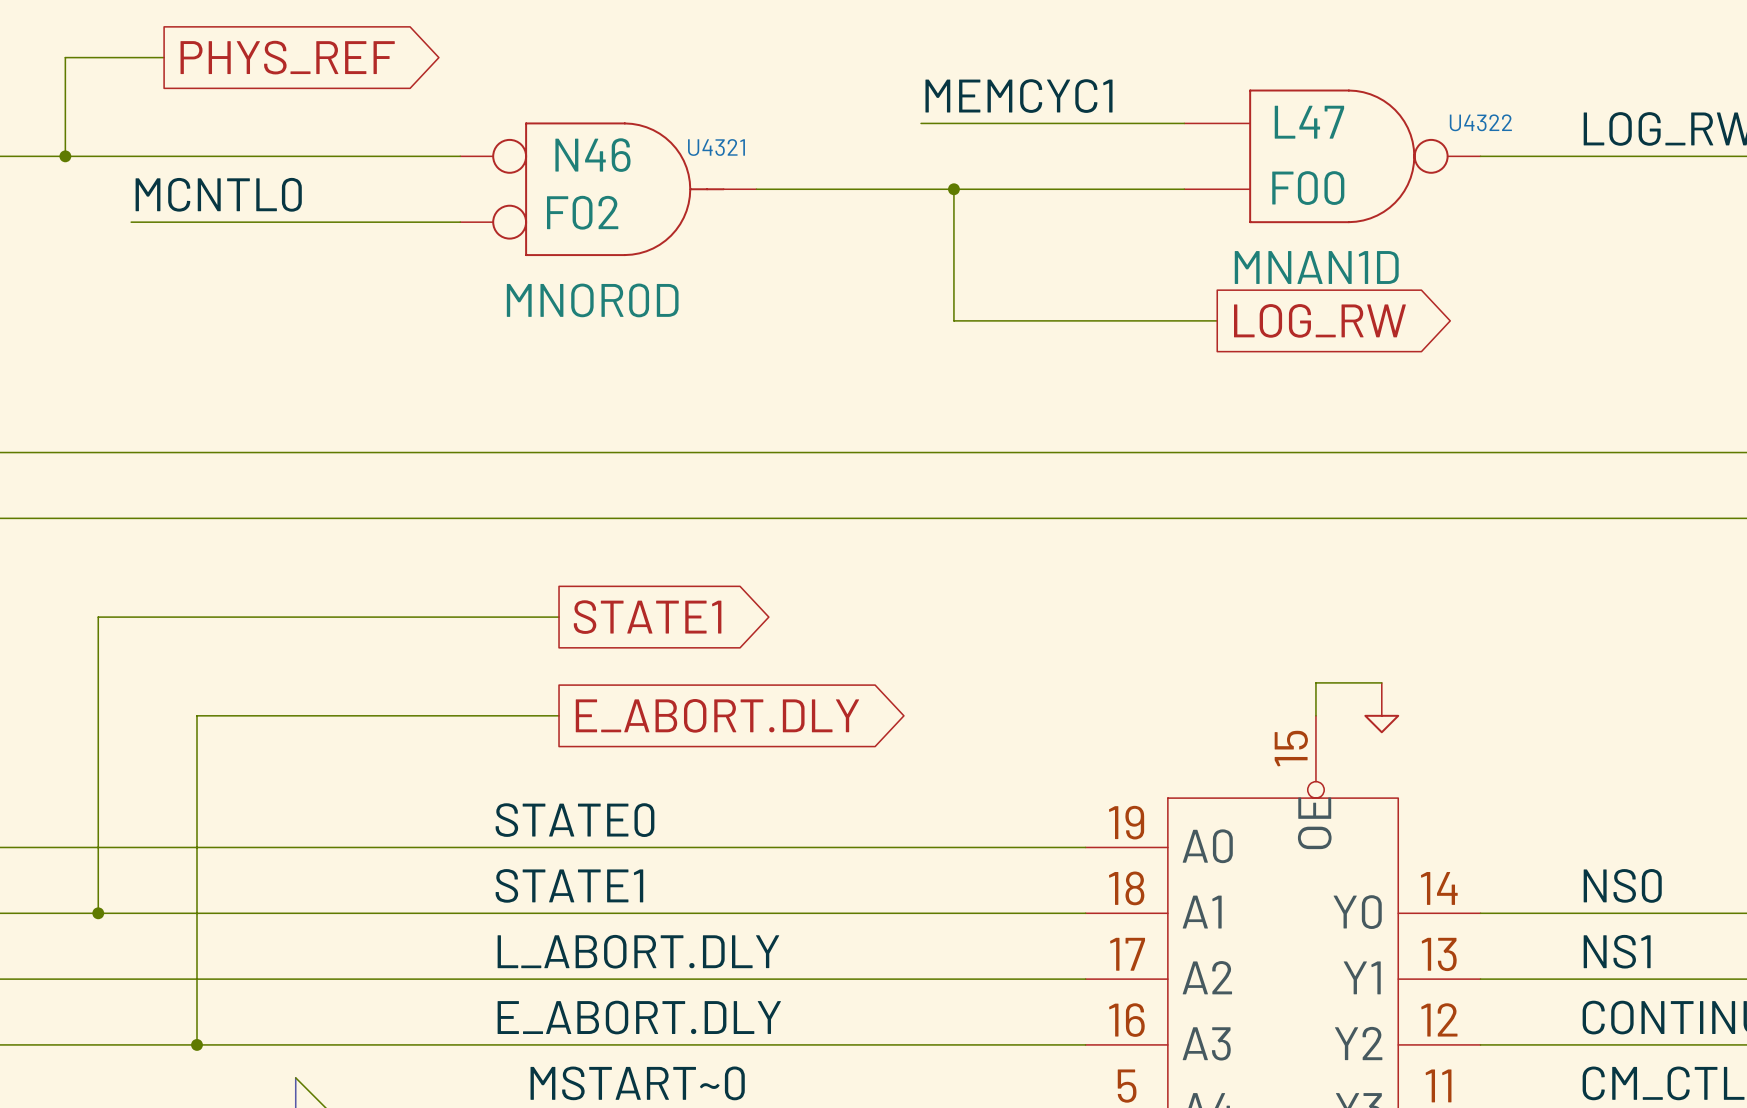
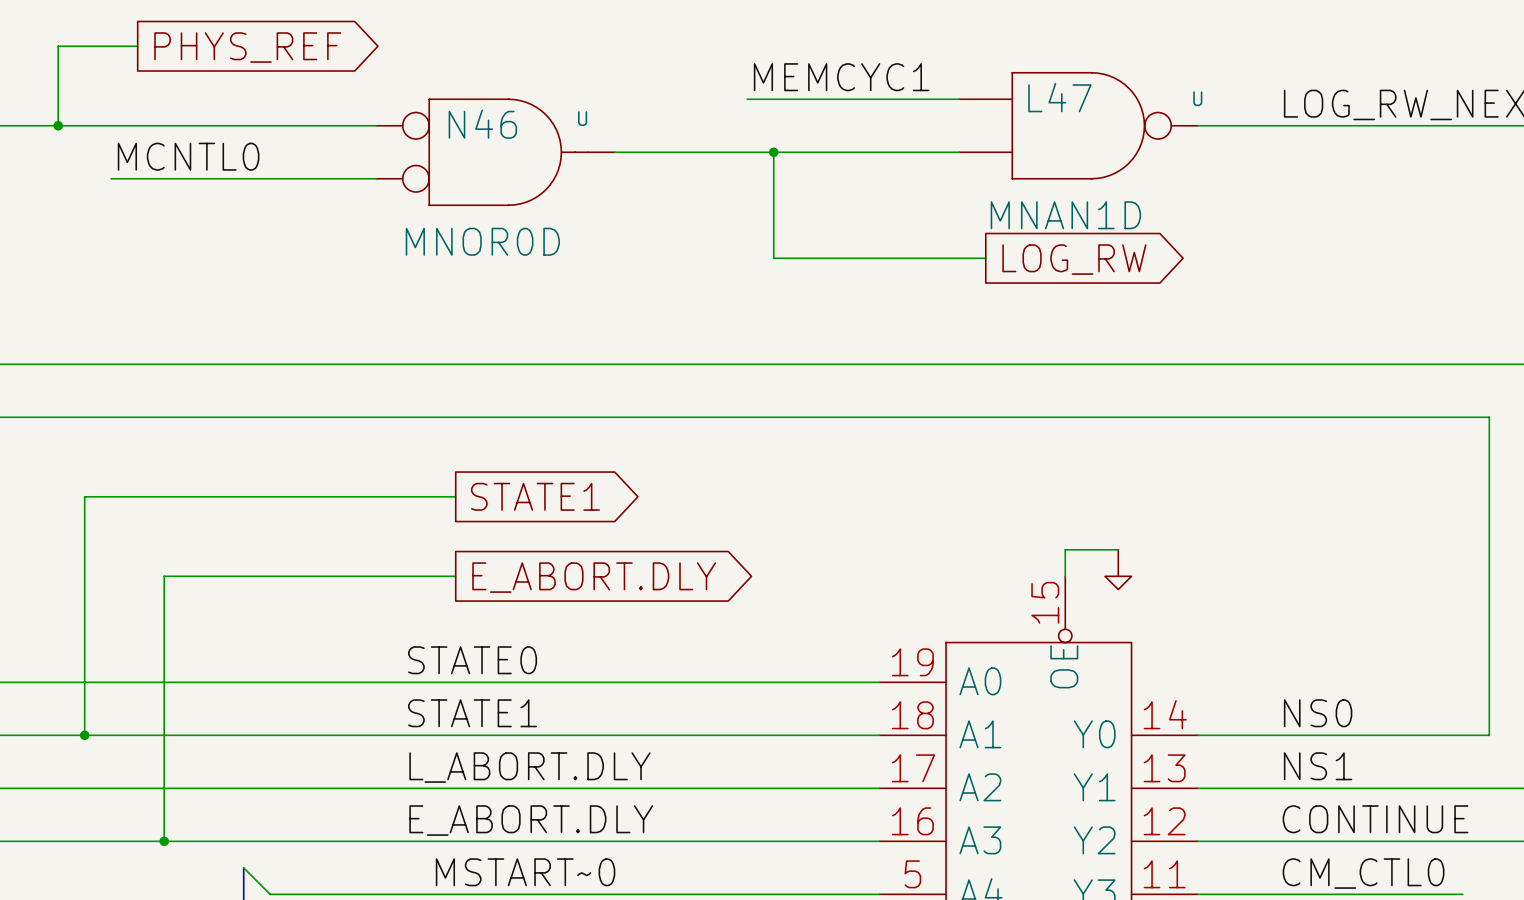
U4322 name: U4322 (1480, 122) -> U (1197, 98)
U4321 name: U4321 (716, 147) -> U (582, 118)
U4322 value: F00 (1308, 188) -> none
U4321 value: F02 (582, 212) -> none

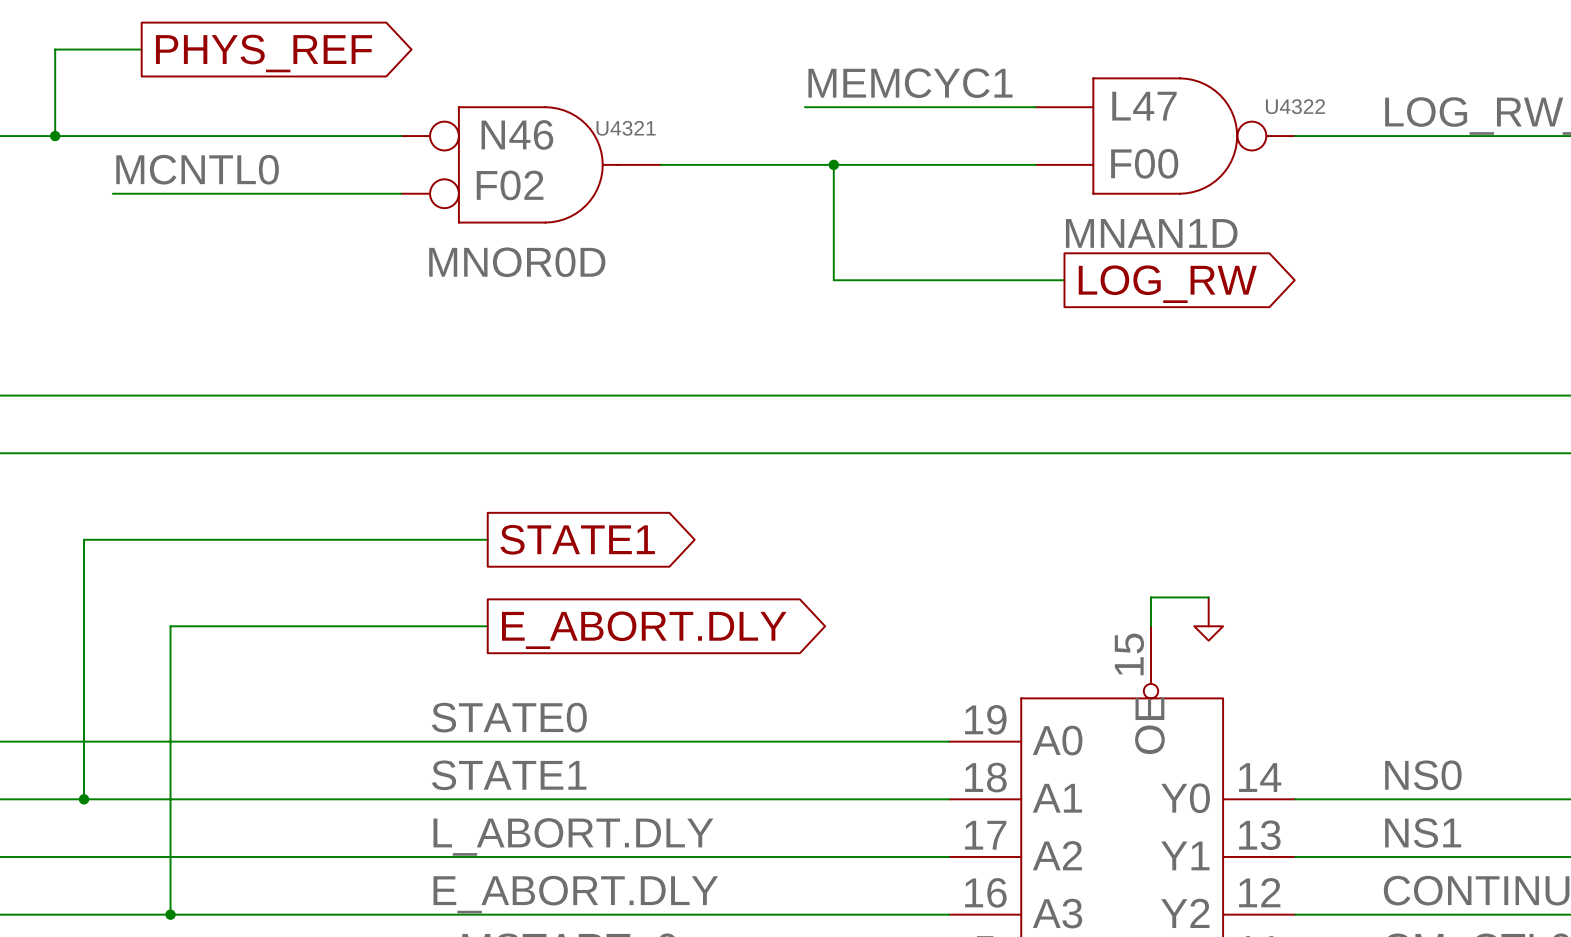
U name: U (1197, 98) -> U4322 (1295, 106)
U name: U (582, 118) -> U4321 (626, 128)
U value: none -> F00 (1144, 163)
U value: none -> F02 (510, 185)

